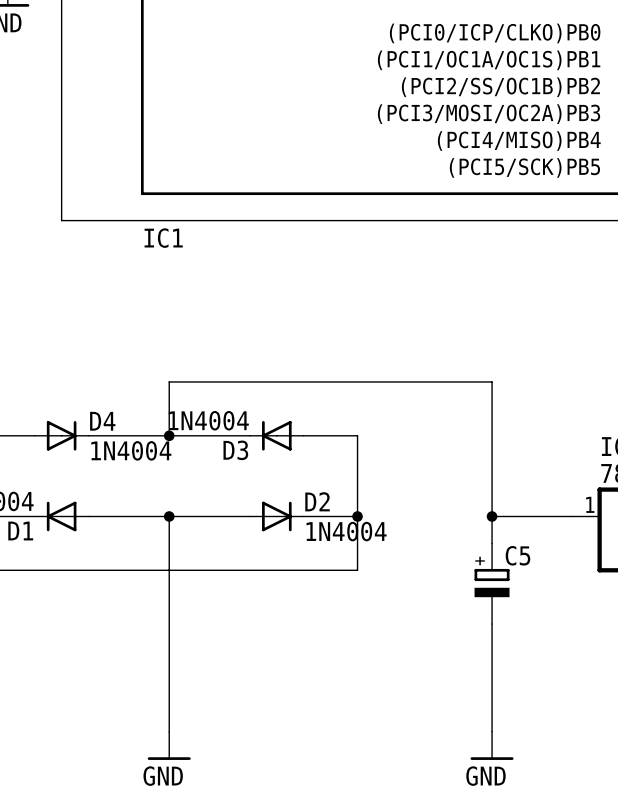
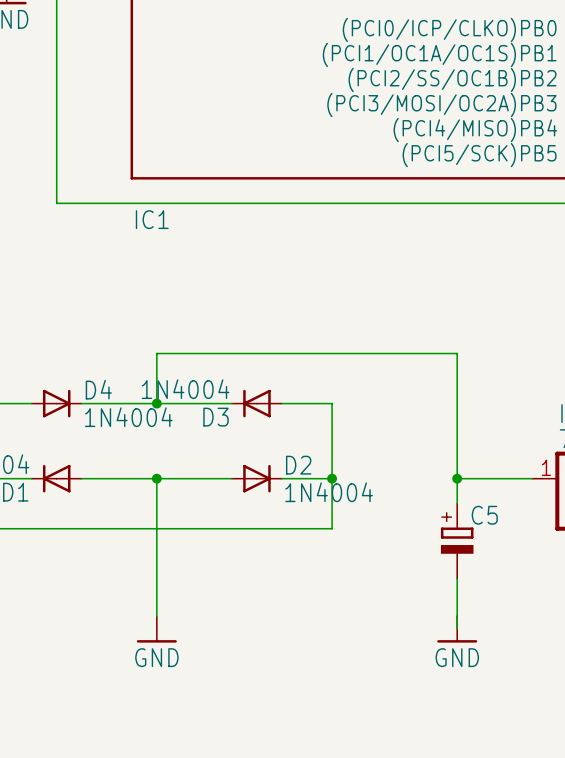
wire: (169, 664) (169, 731) -> none
wire: (492, 677) (492, 731) -> none
power symbol position: GND (169, 745) -> GND (156, 629)
power symbol position: GND (492, 745) -> GND (457, 629)
power symbol text position: GND (163, 776) -> GND (156, 657)
power symbol text position: GND (485, 776) -> GND (457, 657)

